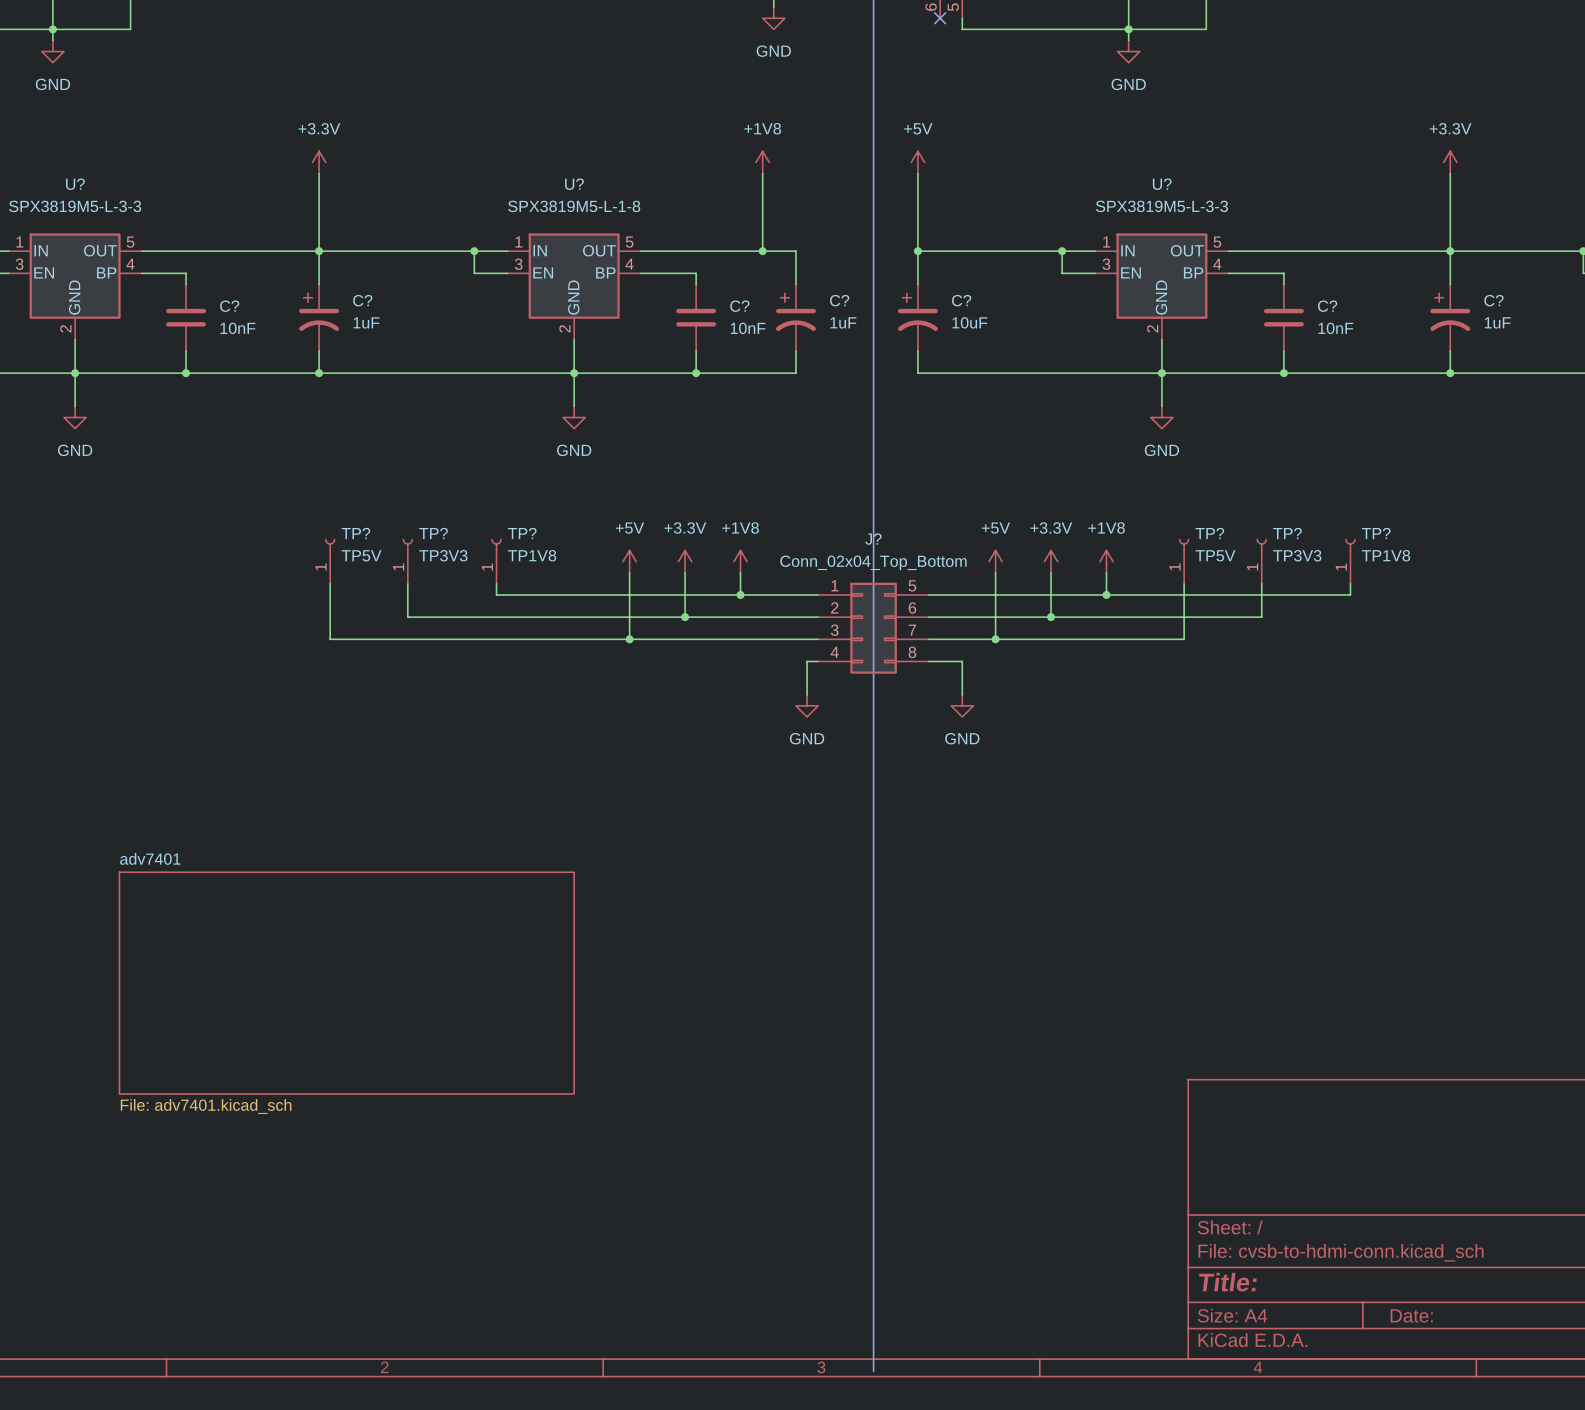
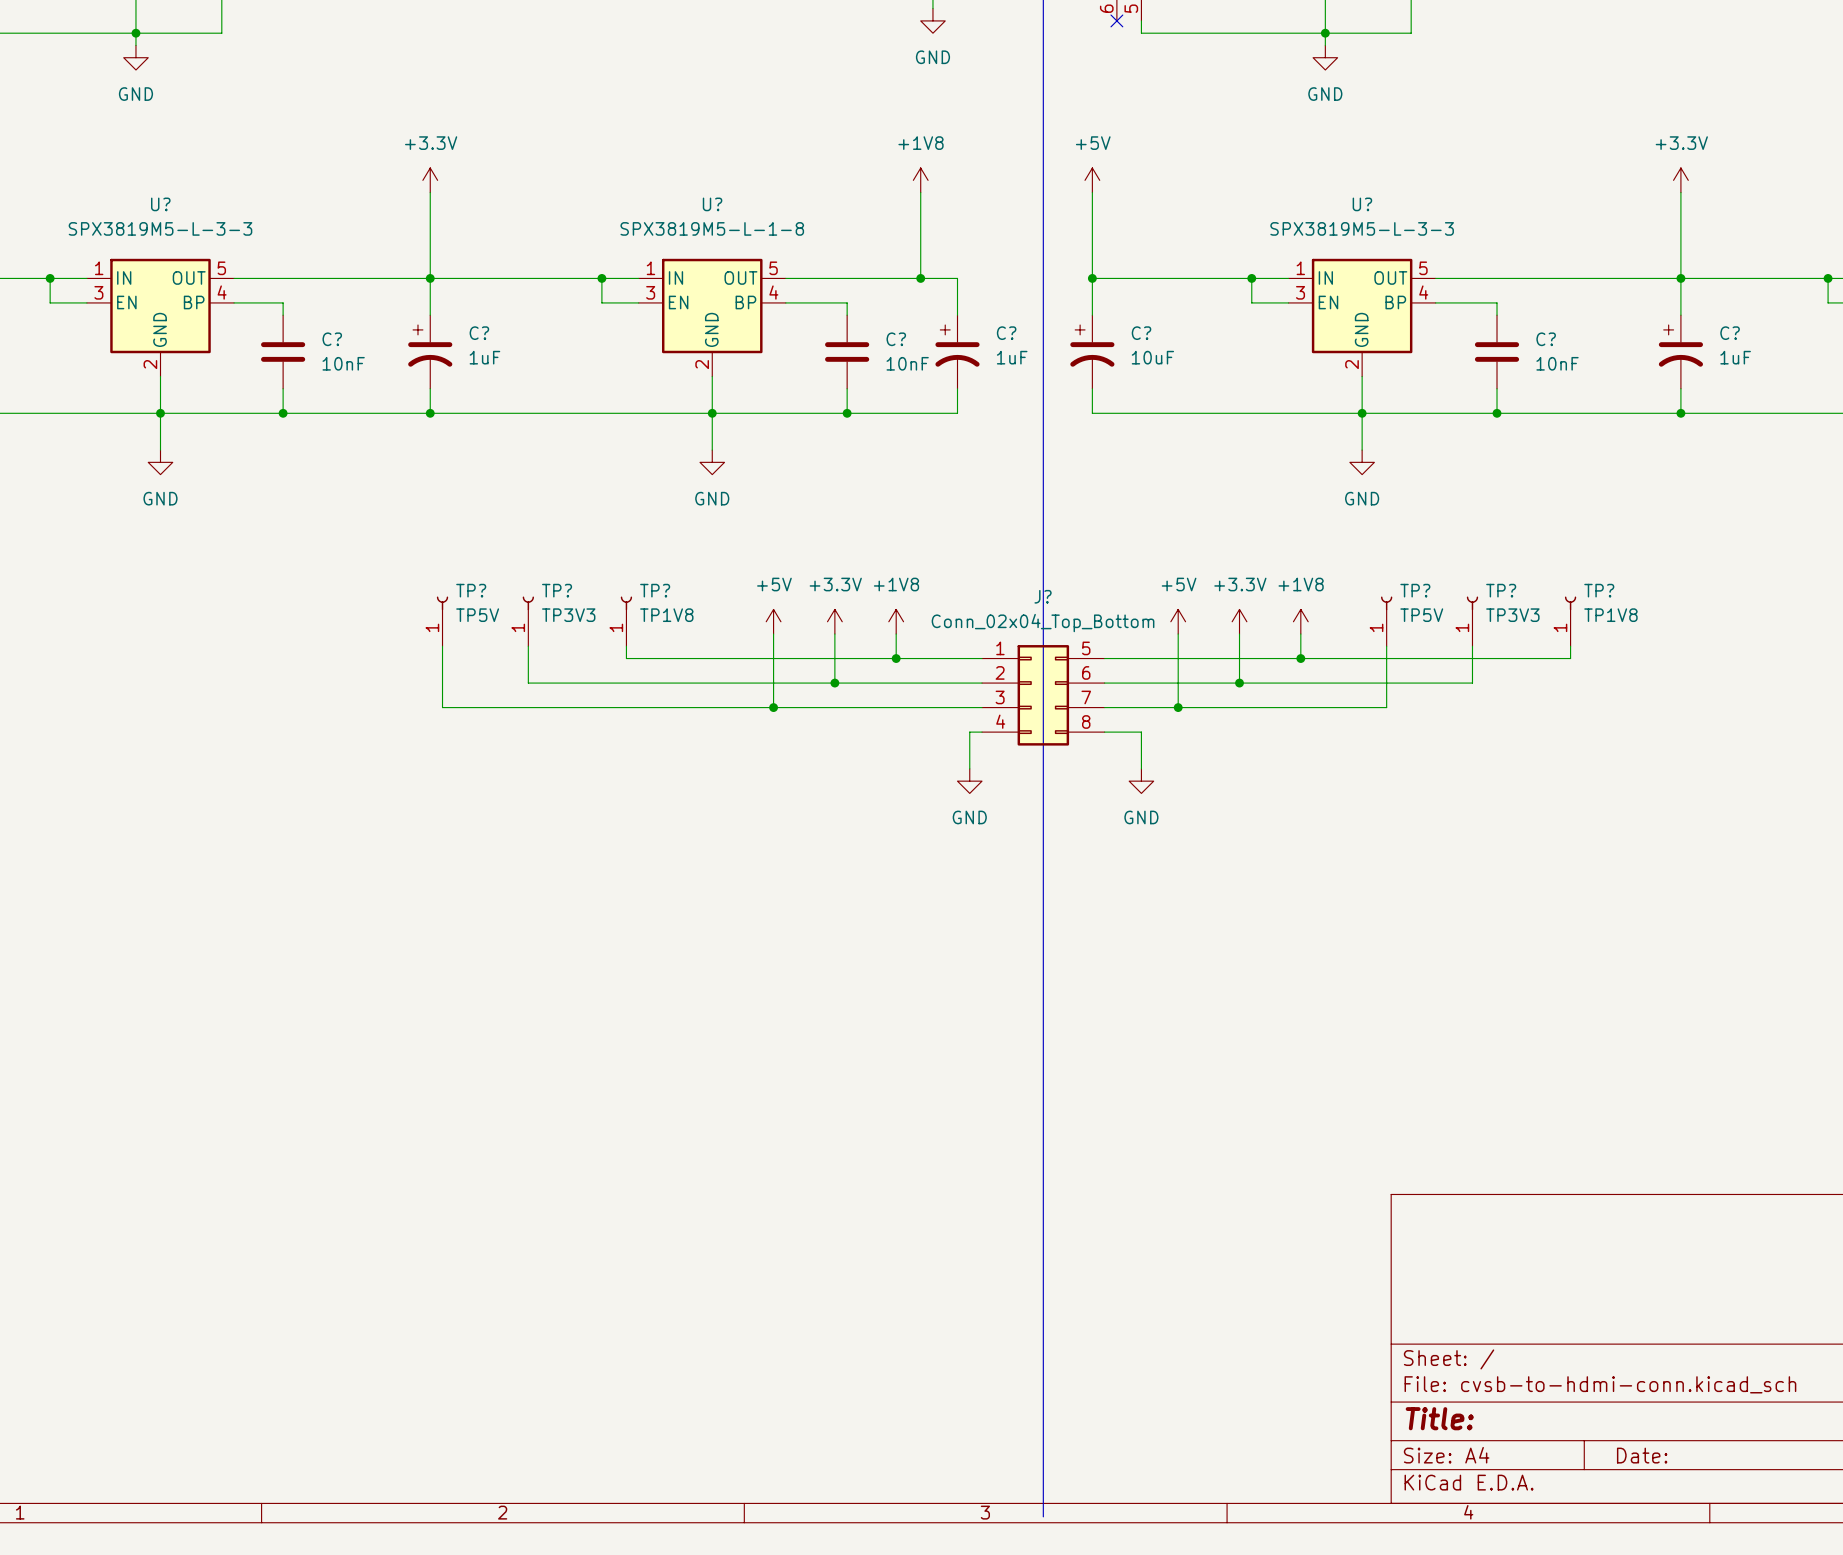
sheet adv7401: File: adv7401.kicad_sch (346, 983) -> none

